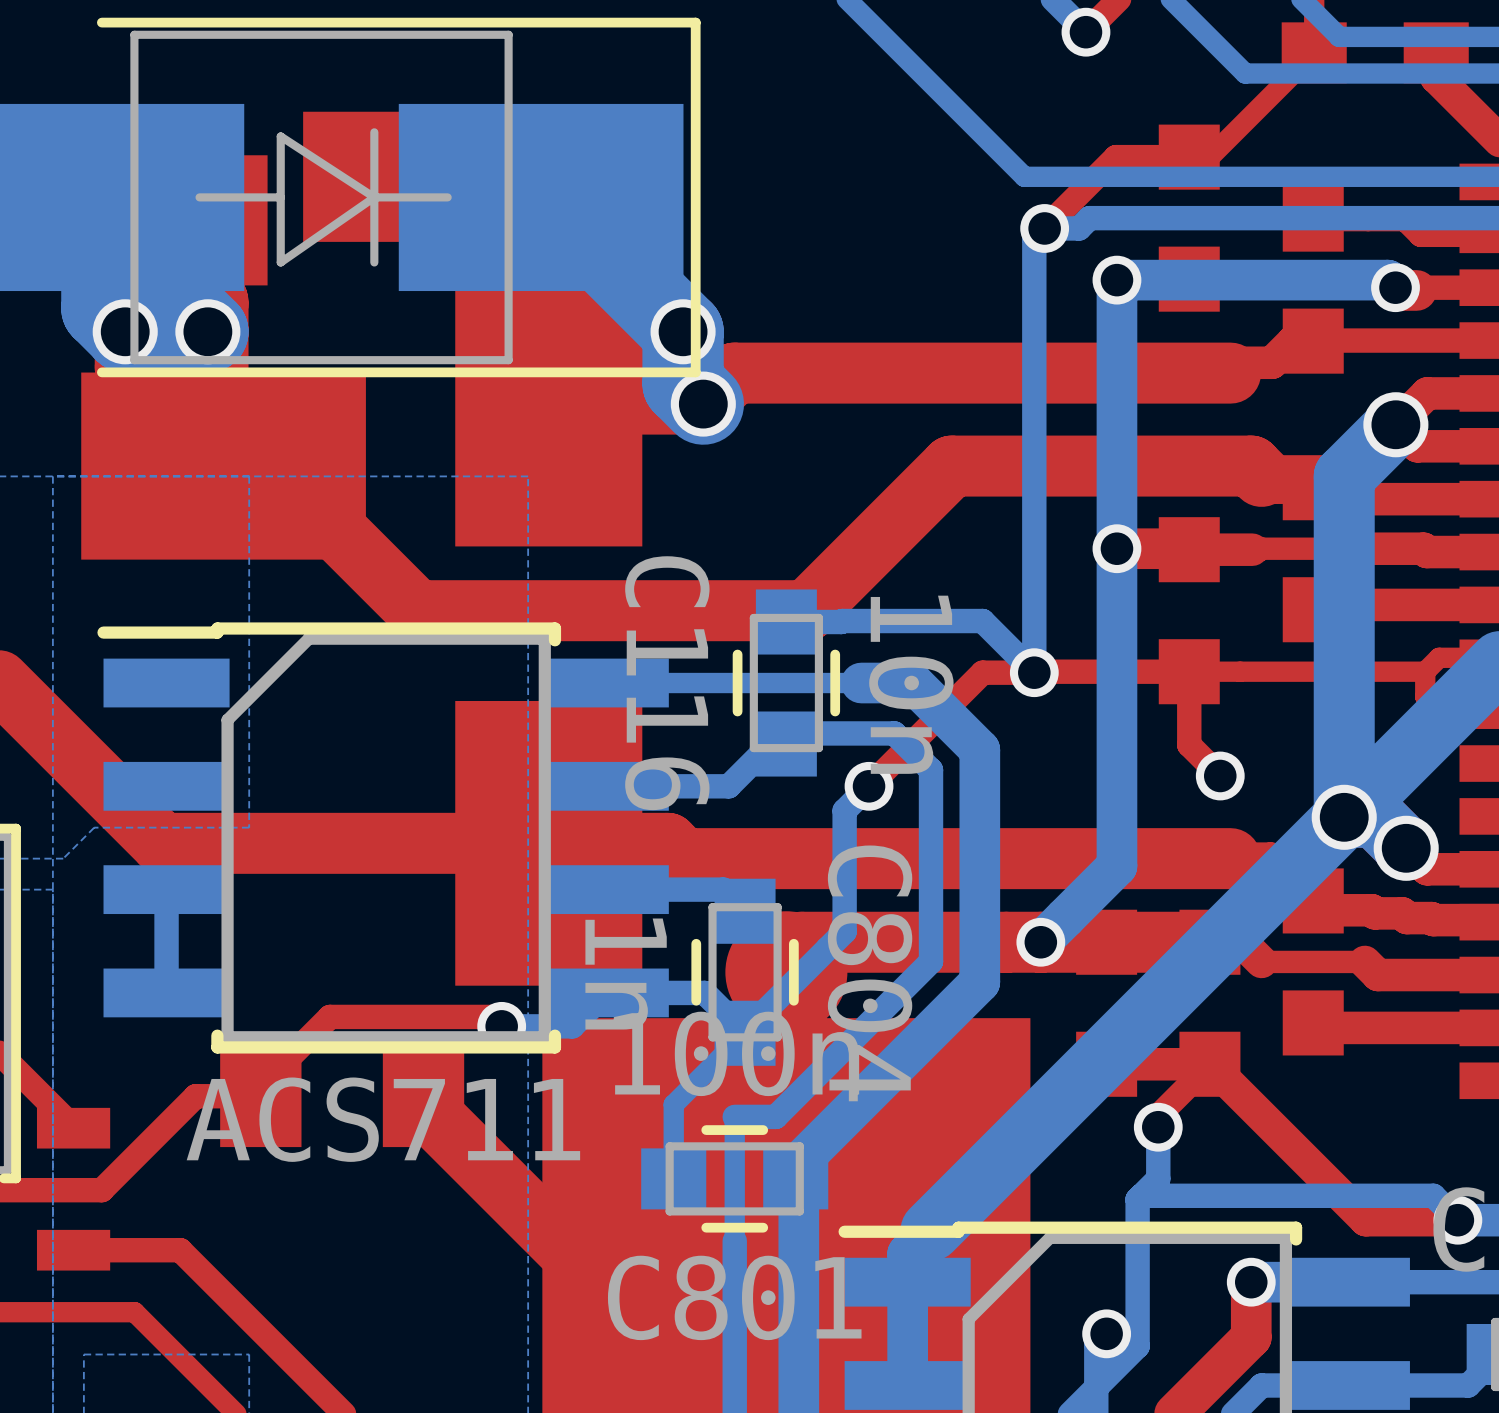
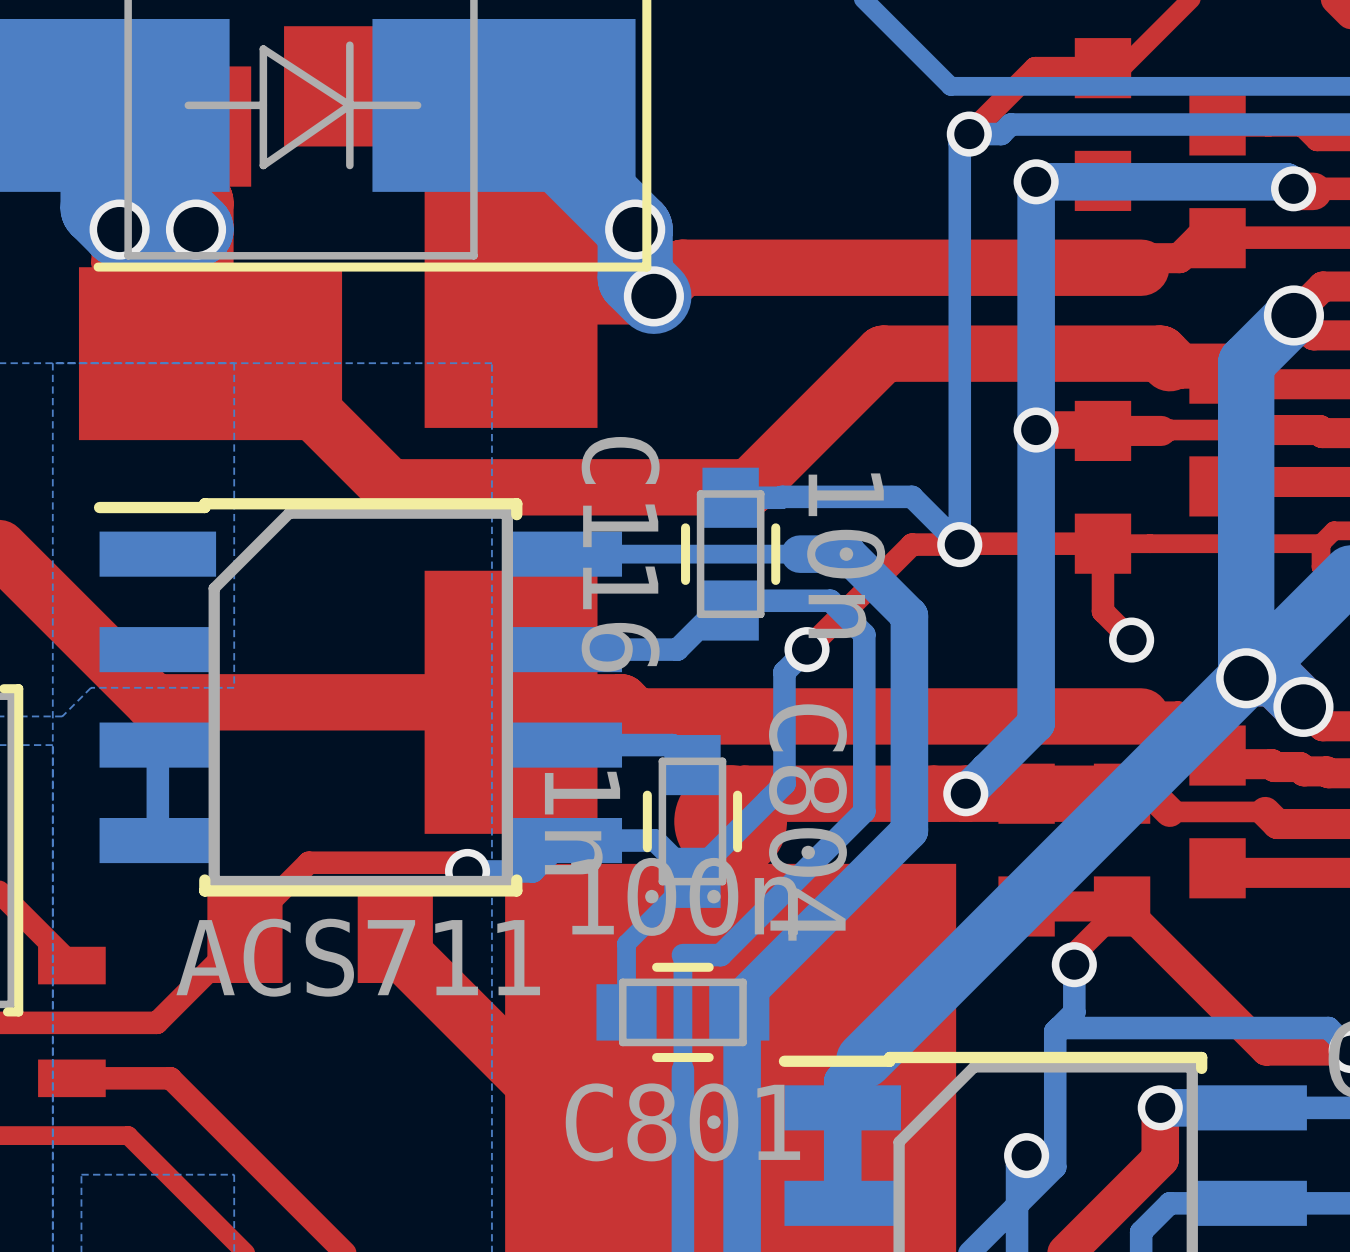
top track: (259, 1096) (195, 1096) (101, 1190) -> (243, 936) (156, 1022) (97, 1022)

